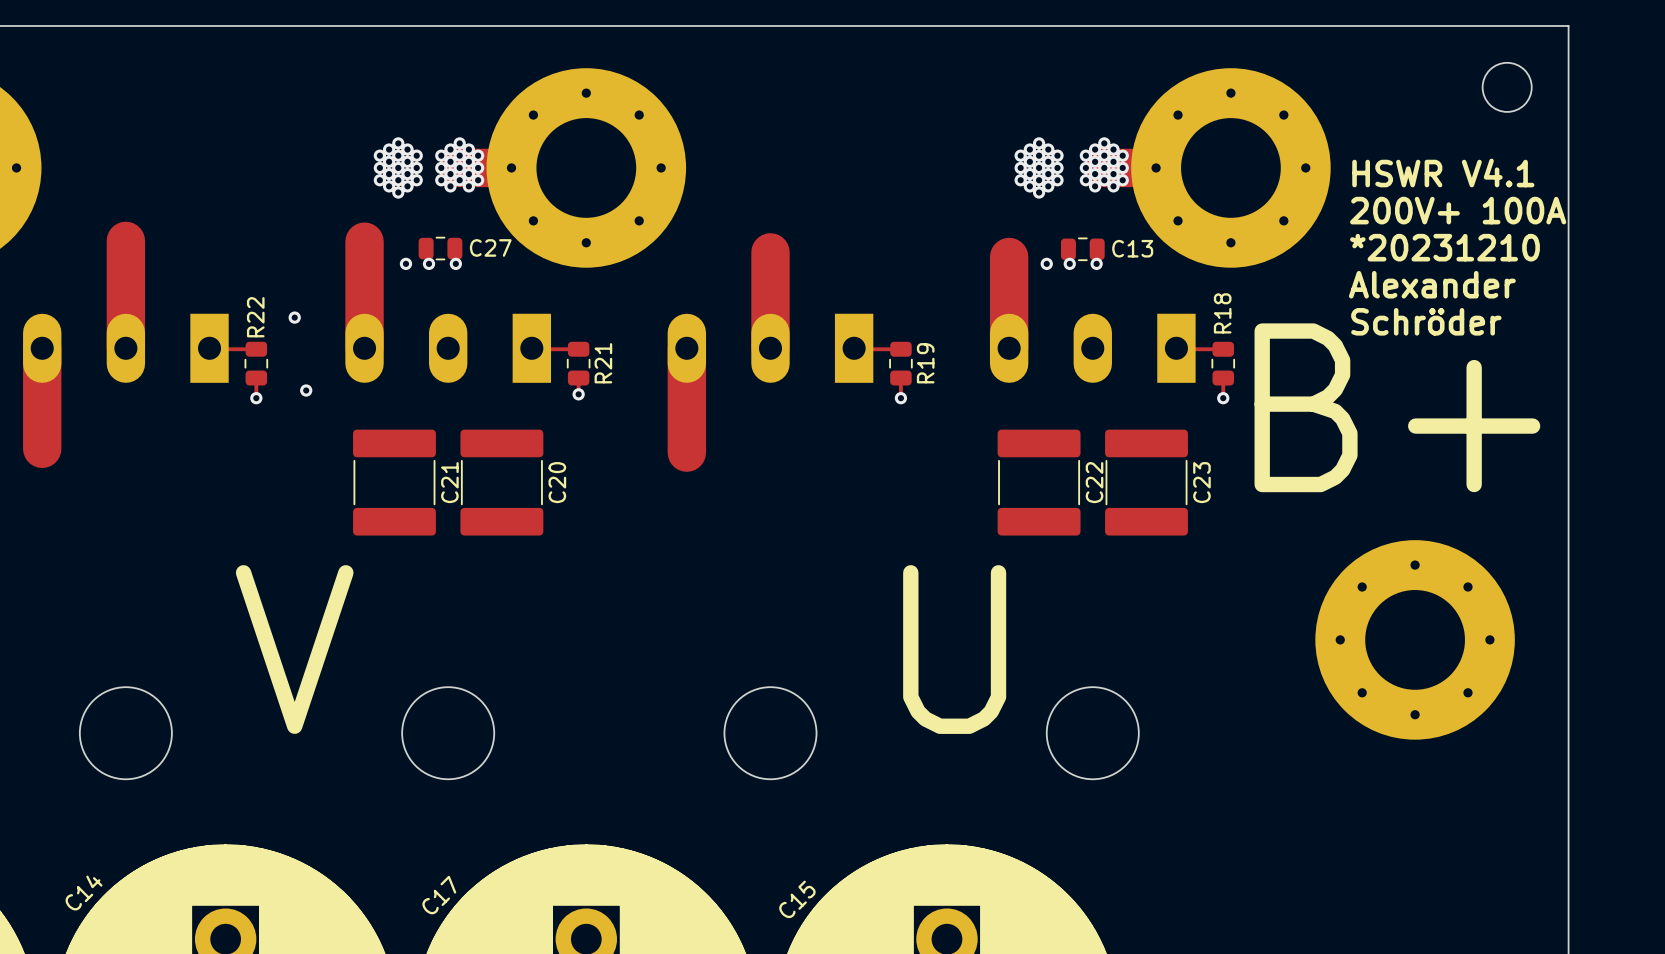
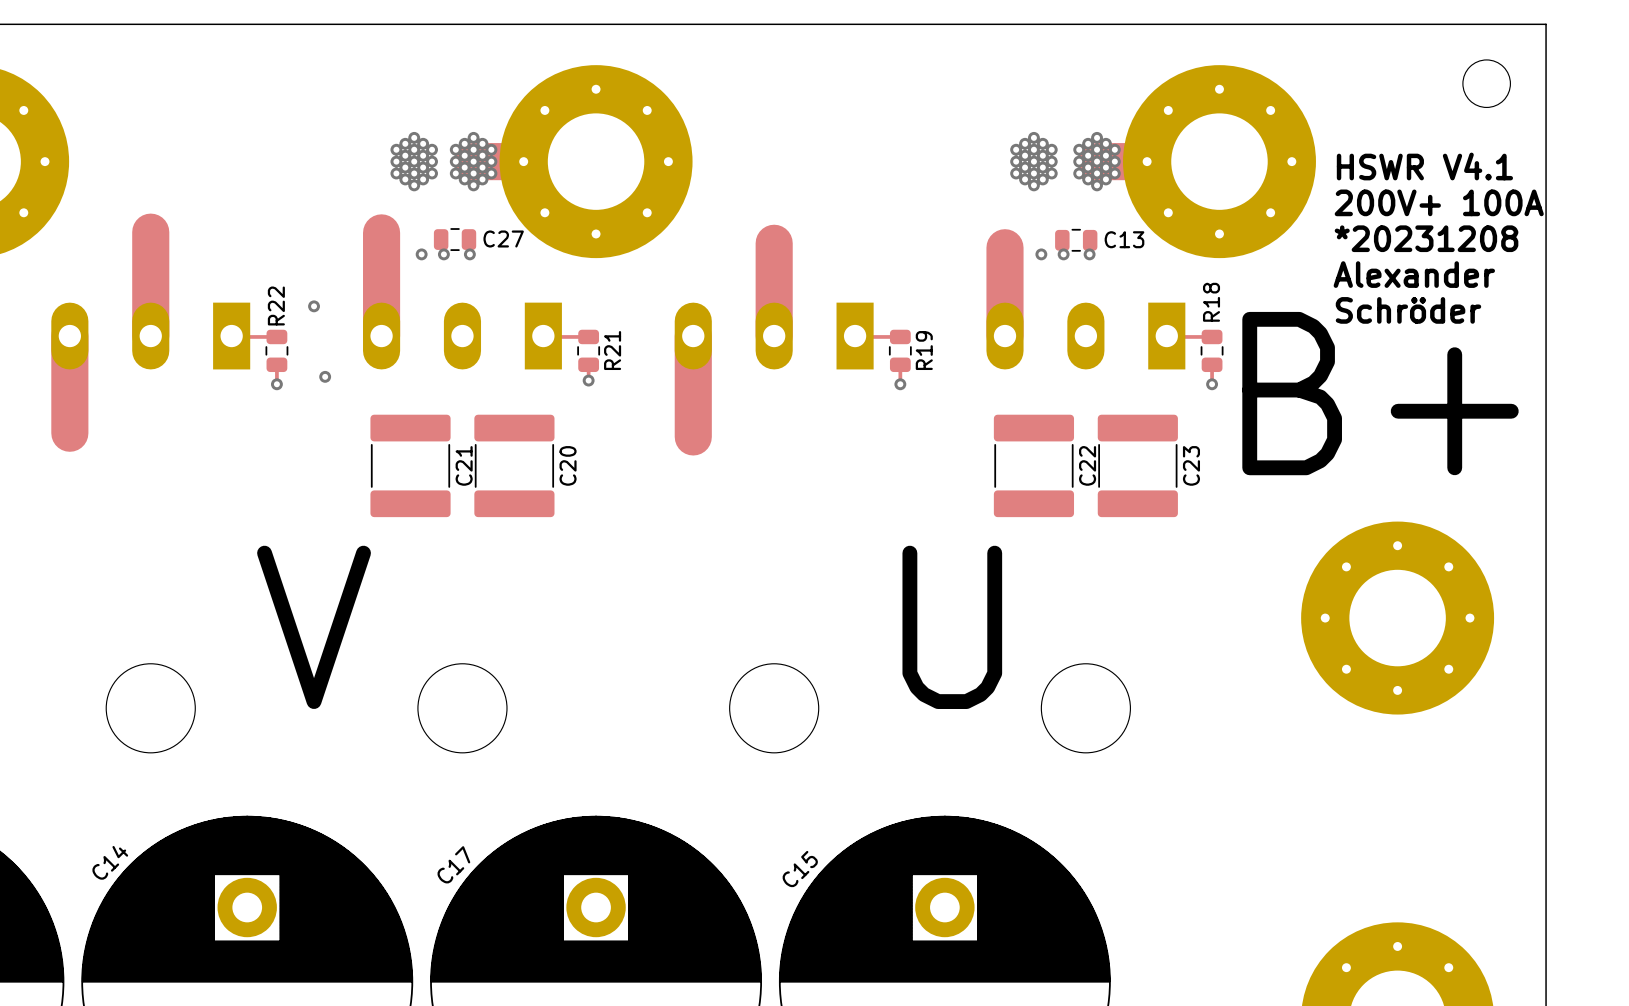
via: none -> (473, 185)
via: none -> (1097, 185)
text: *20231210 (1444, 247) -> *20231208 (1426, 238)

